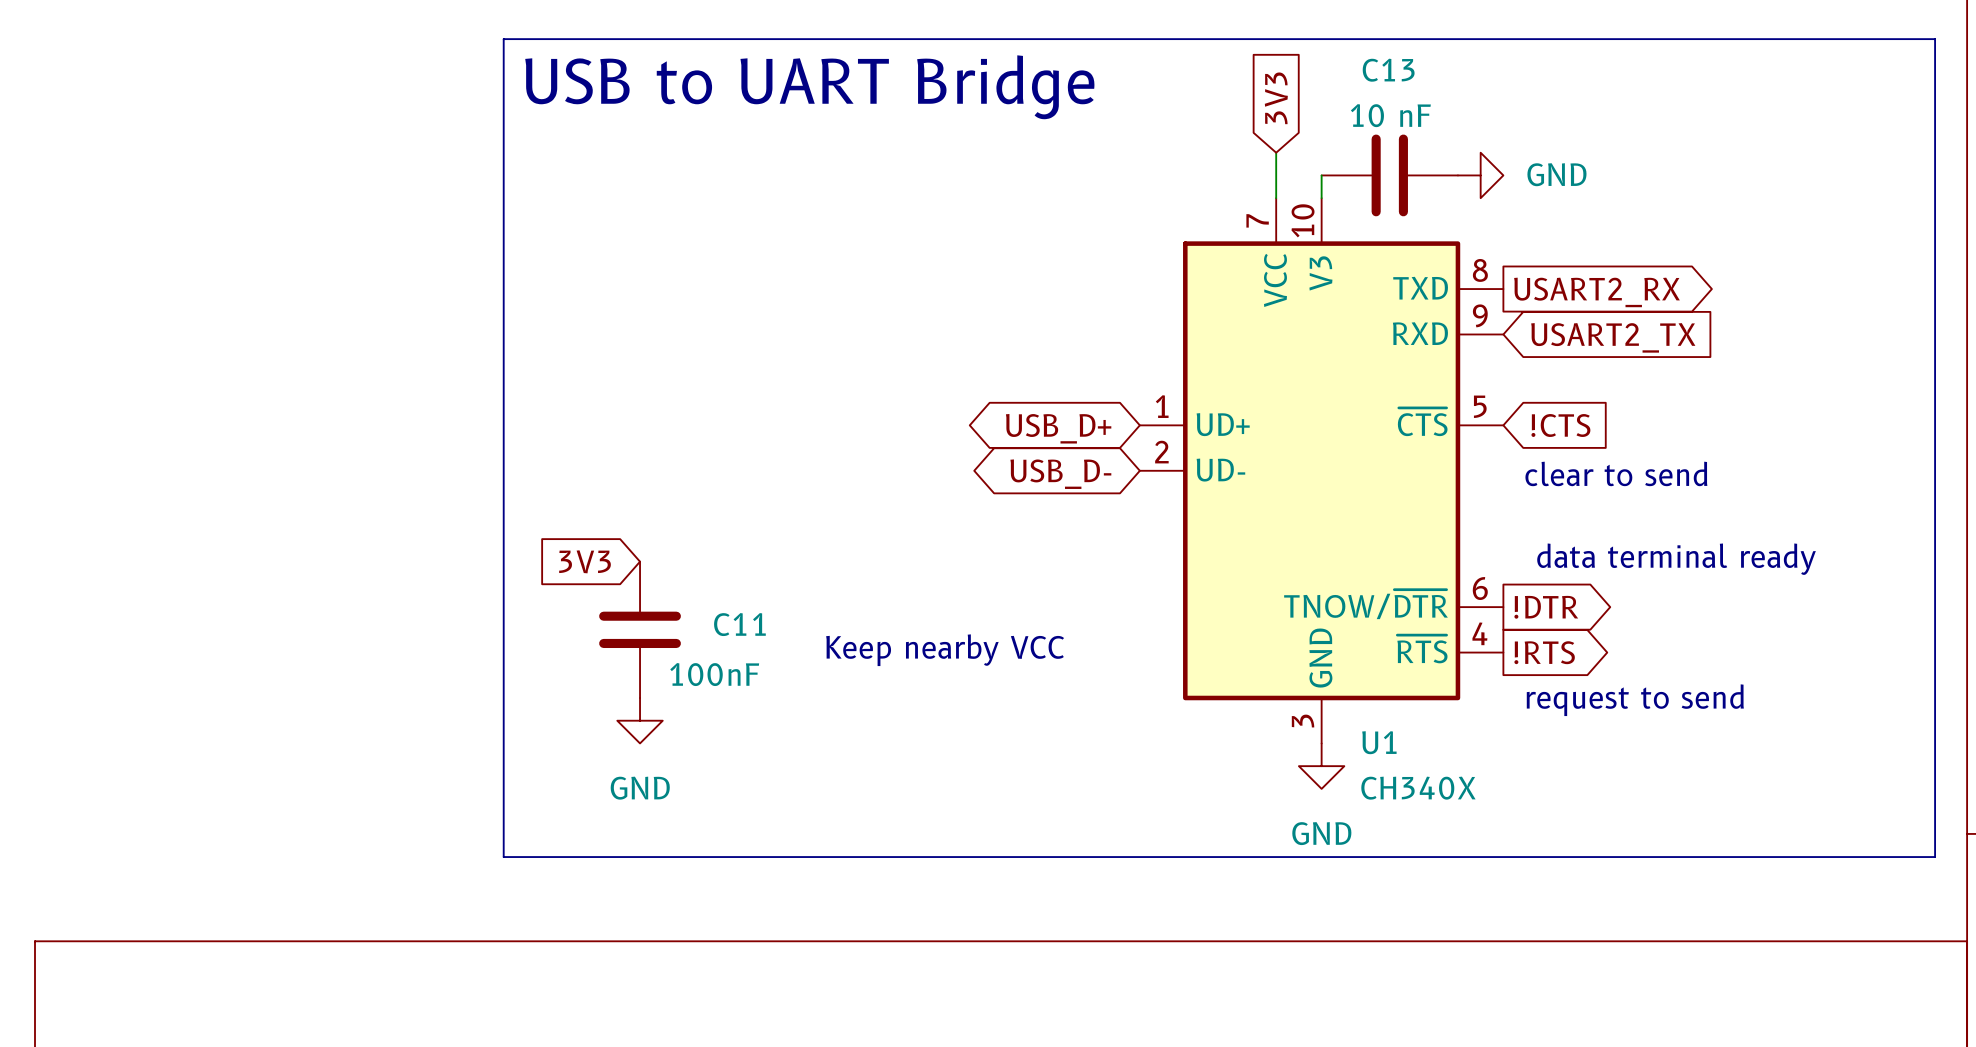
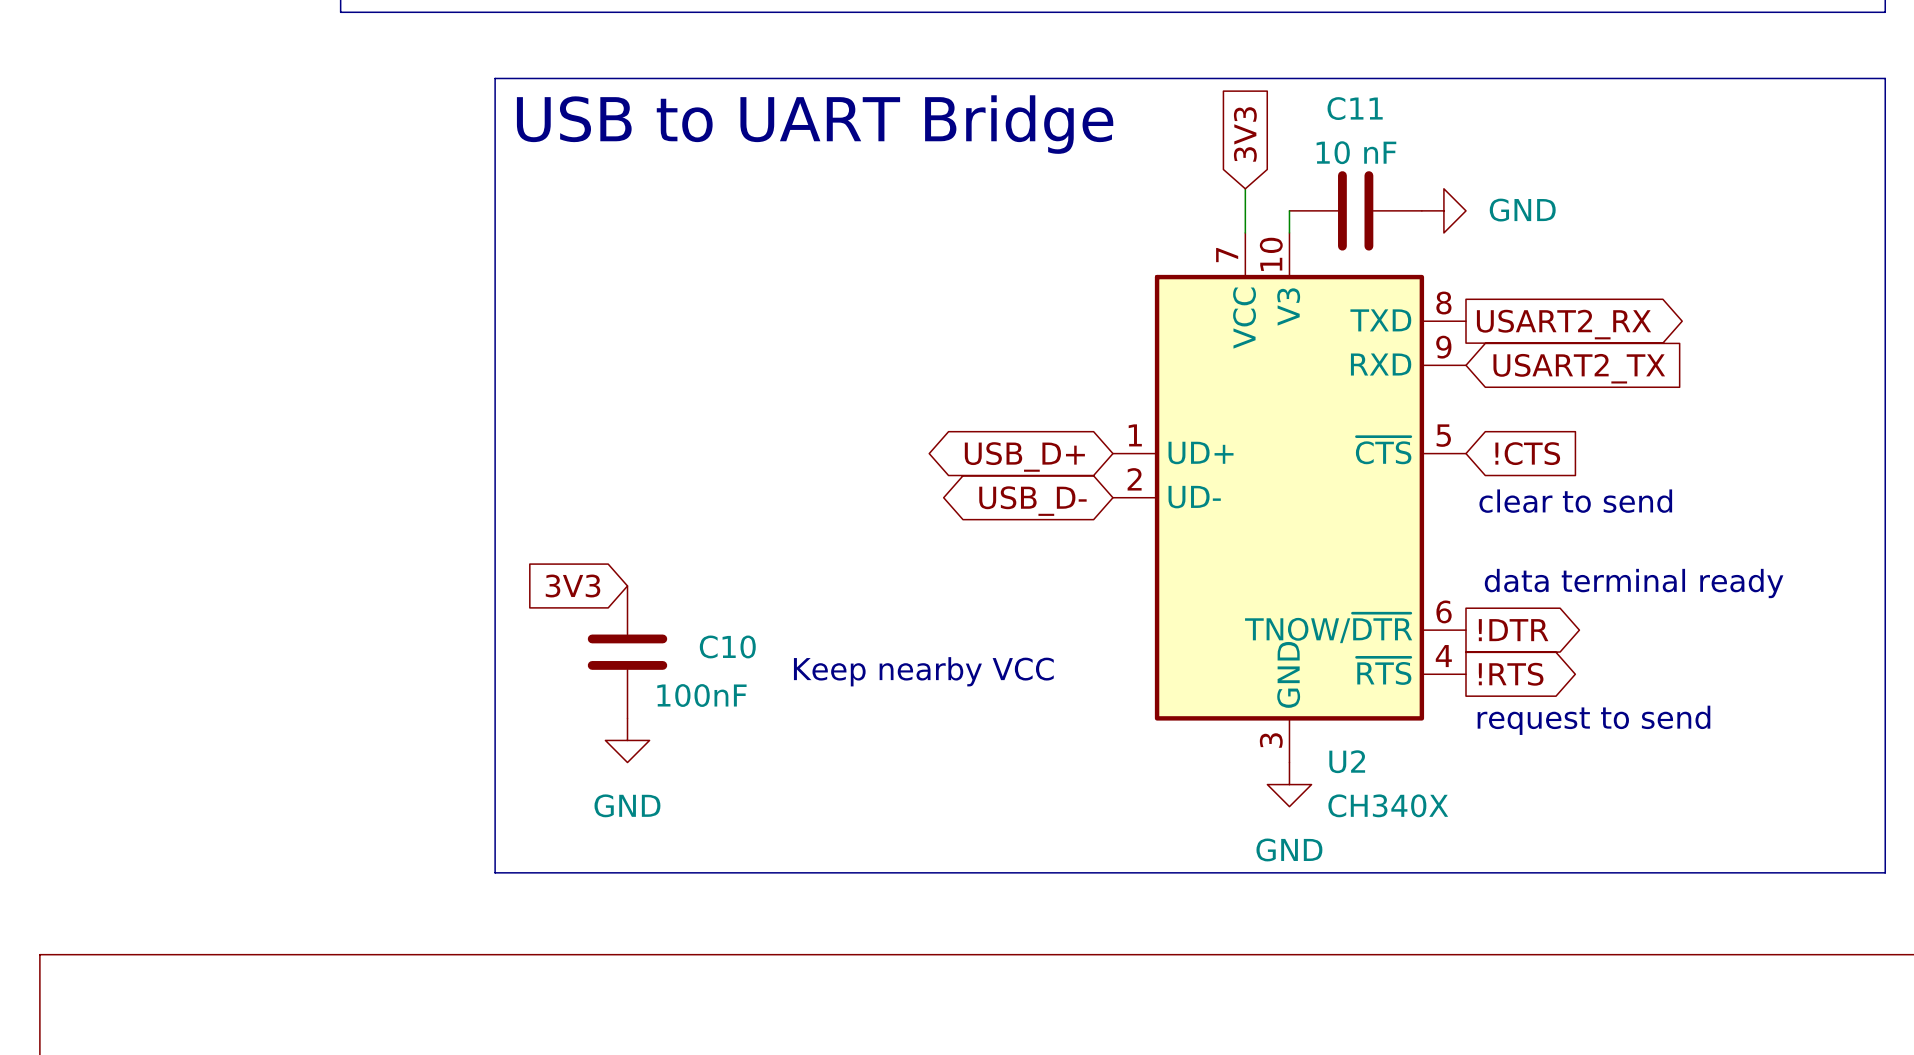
C13 name: C13 (1388, 70) -> C11 (1355, 108)
C11 name: C11 (739, 624) -> C10 (727, 646)
U1 name: U1 (1379, 742) -> U2 (1347, 761)

